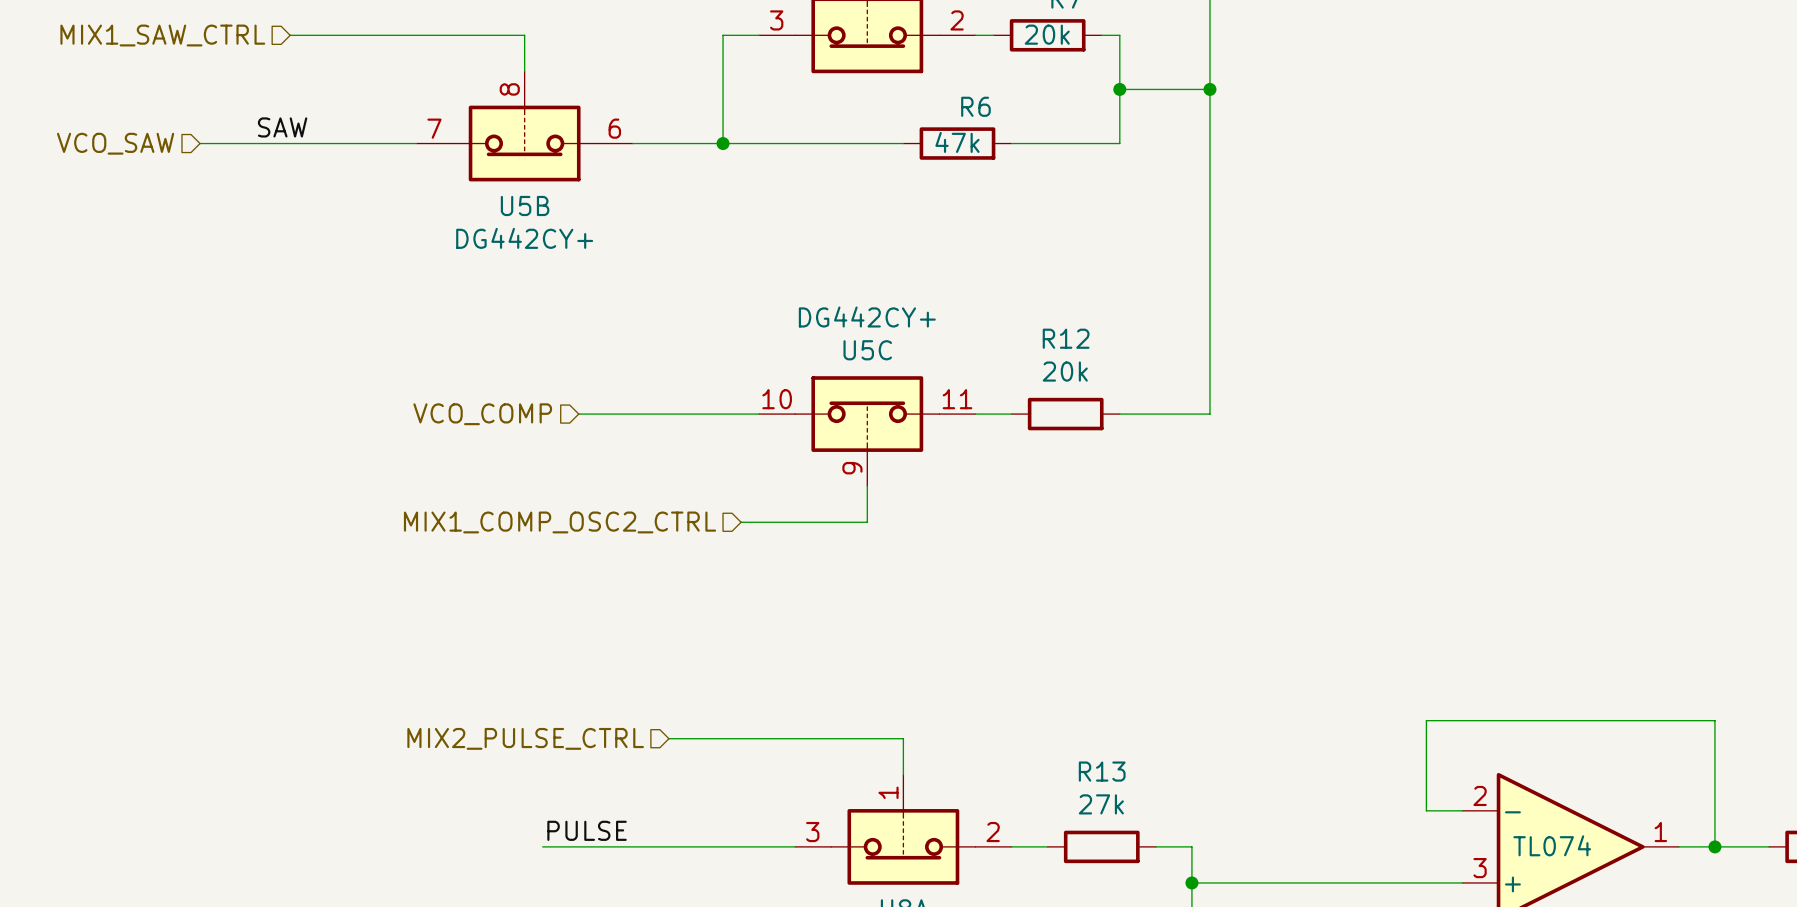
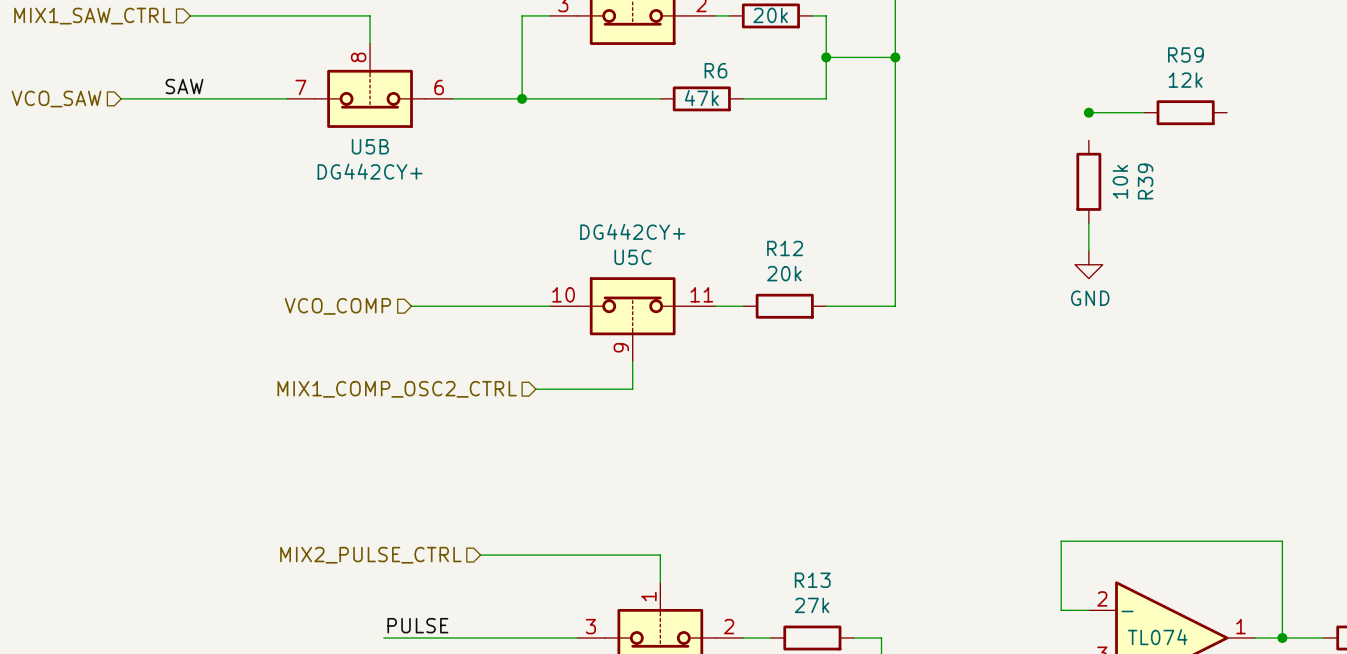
wire: none -> (1088, 112) (1144, 112)
junction: none -> (1088, 112)
R59: none -> 12k (1185, 112)
R39: none -> 10k (1088, 181)
wire: none -> (1088, 223) (1088, 250)
power symbol: none -> GND (1088, 264)

